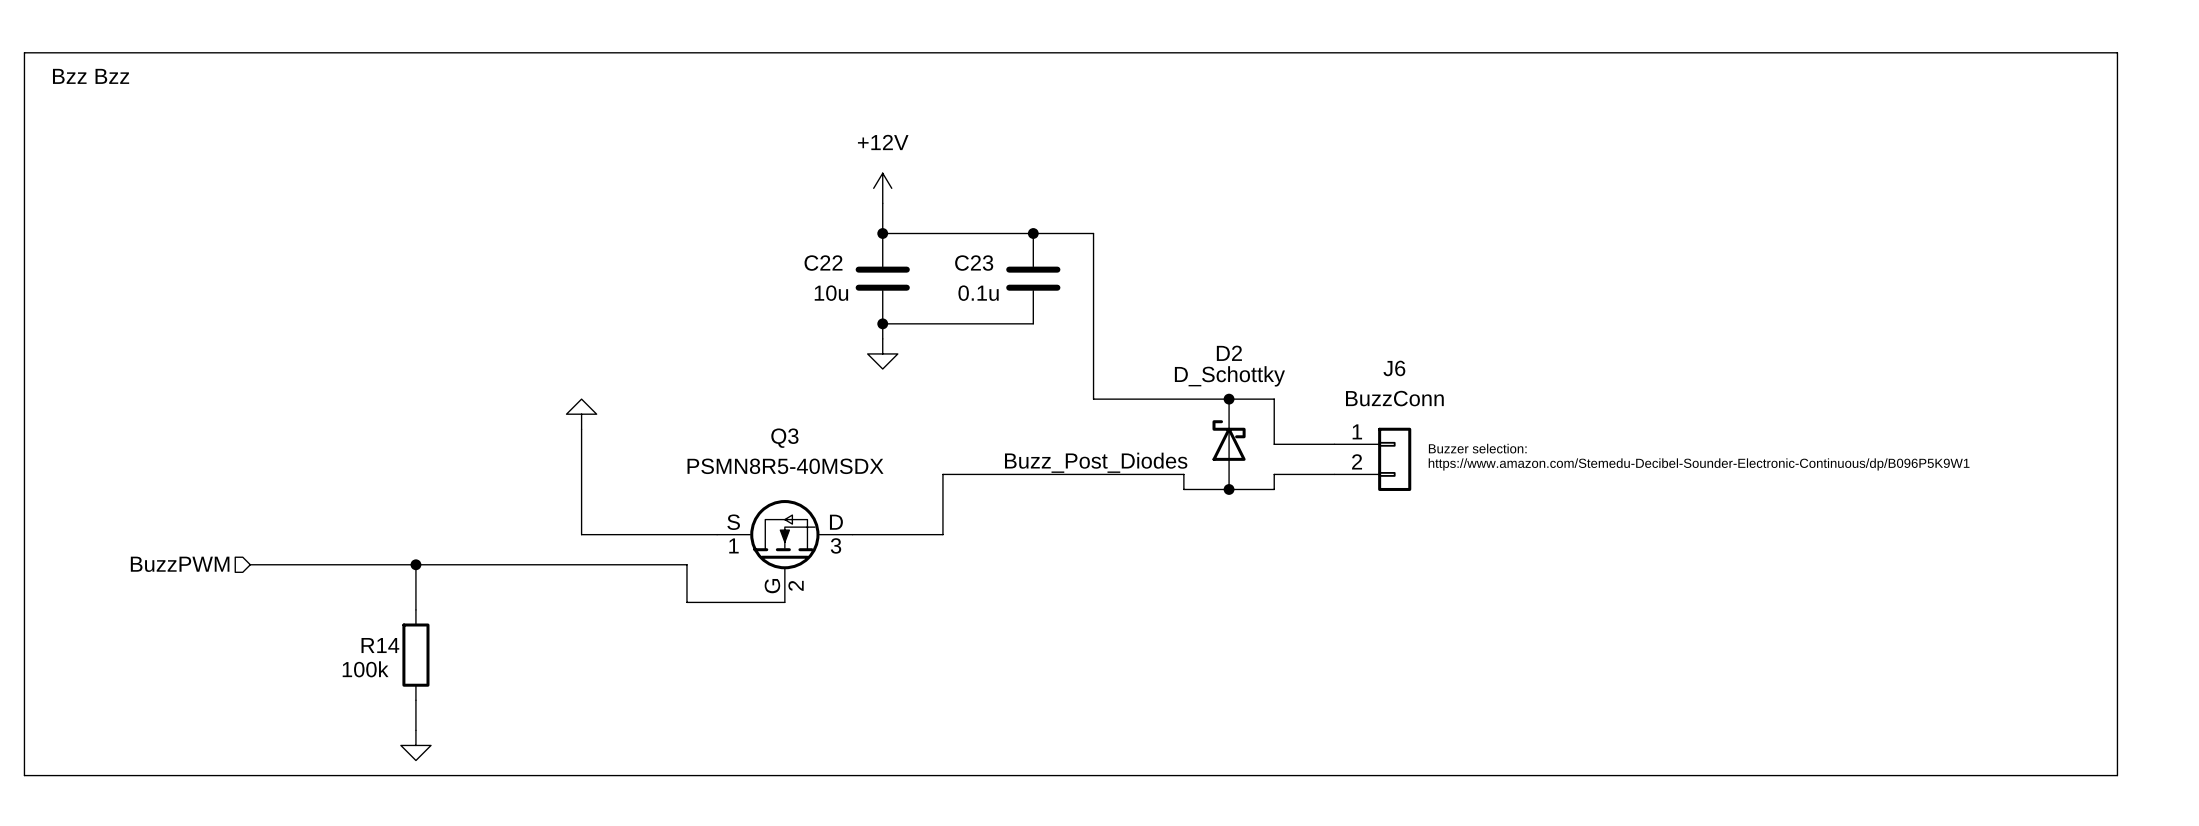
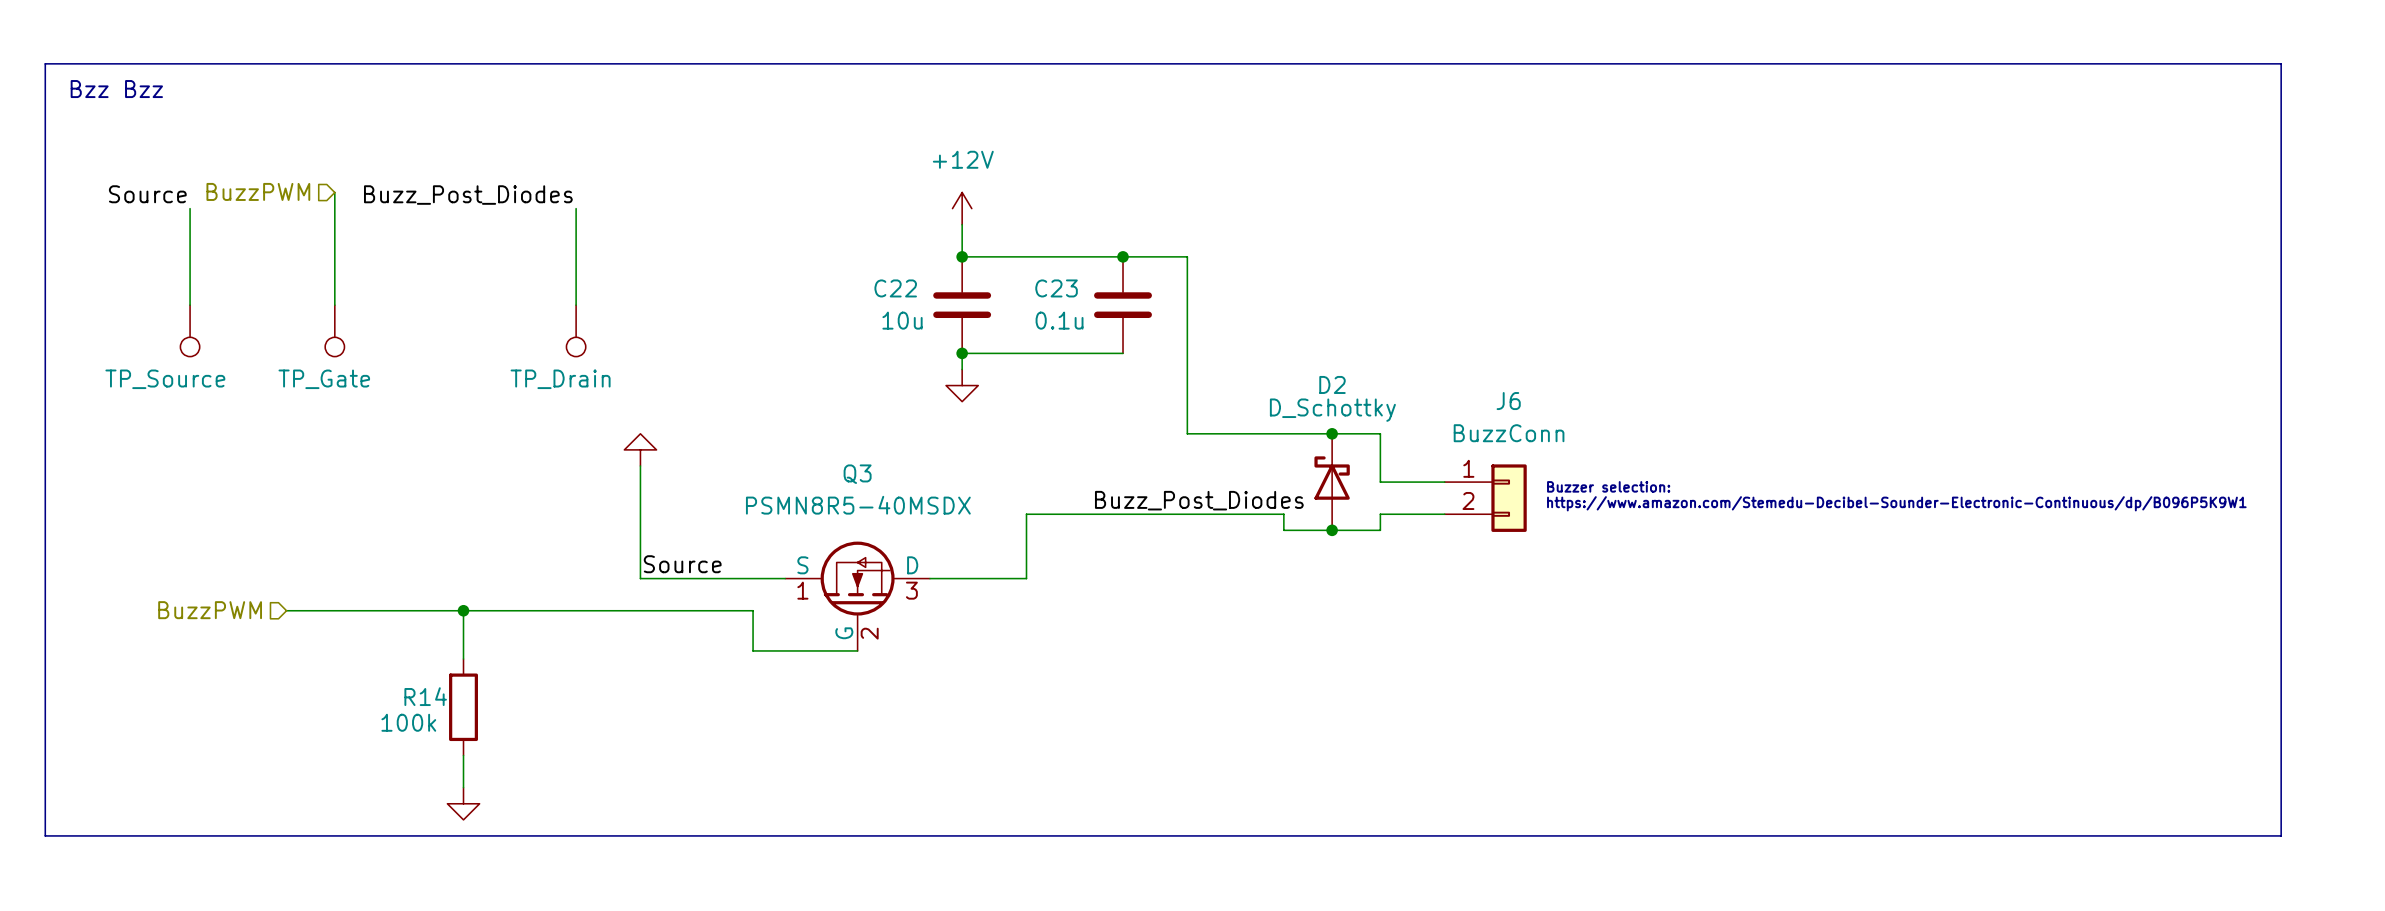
hierarchical label: none -> BuzzPWM (258, 191)
wire: none -> (334, 192) (334, 305)
label: none -> Source (147, 194)
label: none -> Buzz_Post_Diodes (468, 195)
wire: none -> (190, 208) (190, 305)
wire: none -> (576, 208) (576, 305)
TP_Source: none -> (190, 330)
TP_Gate: none -> (334, 330)
TP_Drain: none -> (576, 330)
label: none -> Source (682, 564)

